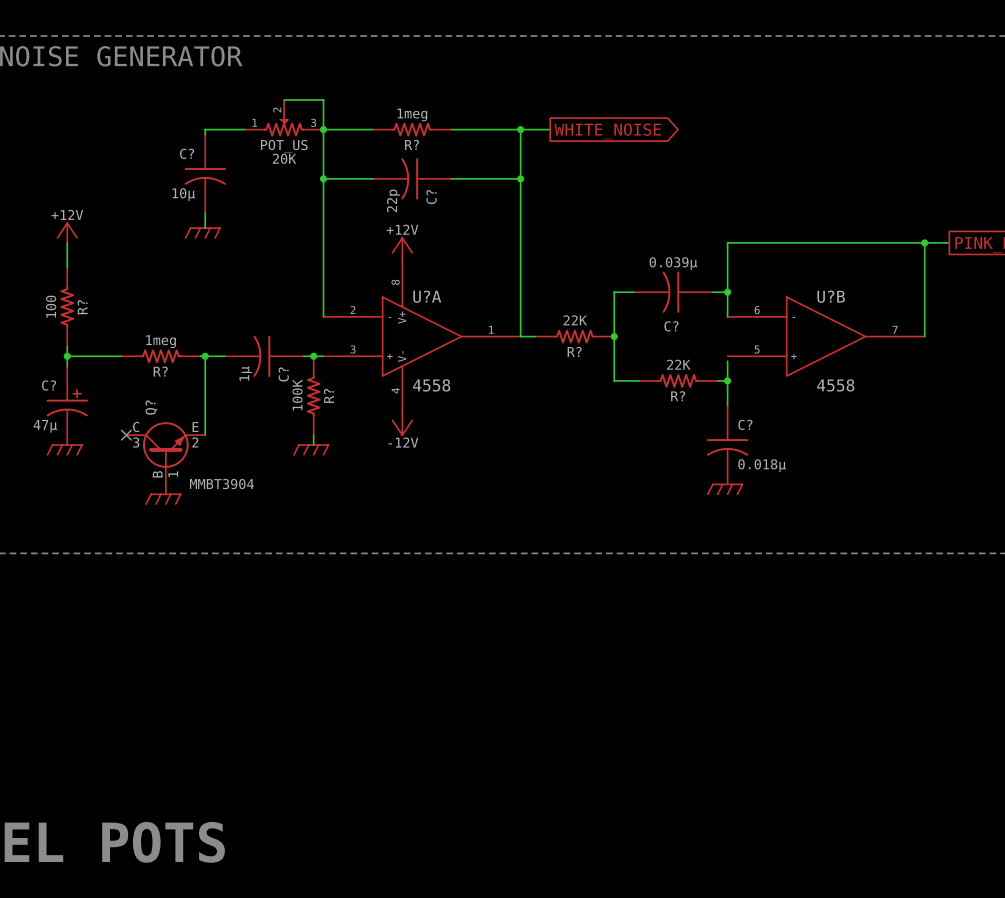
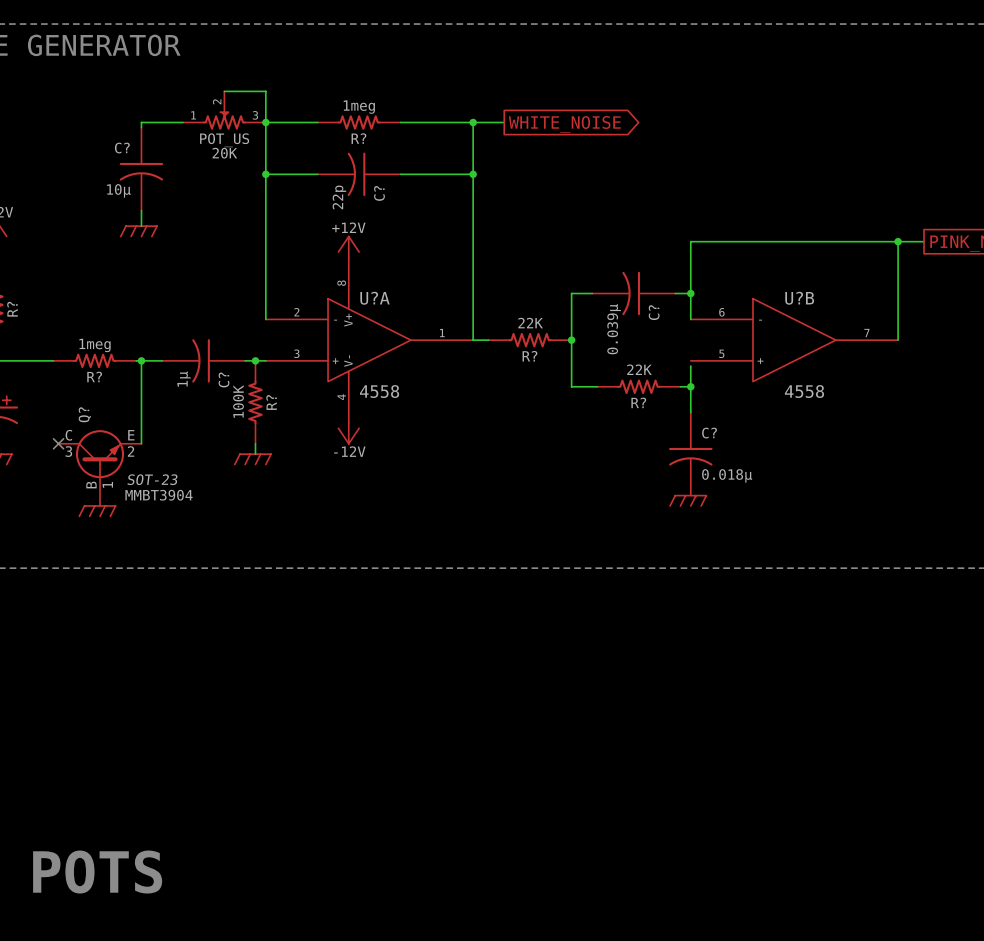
C? value rotation: 0° (673, 263) -> 90° counterclockwise (614, 329)
C? value position: 0.039μ (673, 263) -> 0.039μ (614, 329)
C? name rotation: 0° (671, 326) -> 90° counterclockwise (654, 312)
Q? text: none -> SOT-23 (152, 479)

